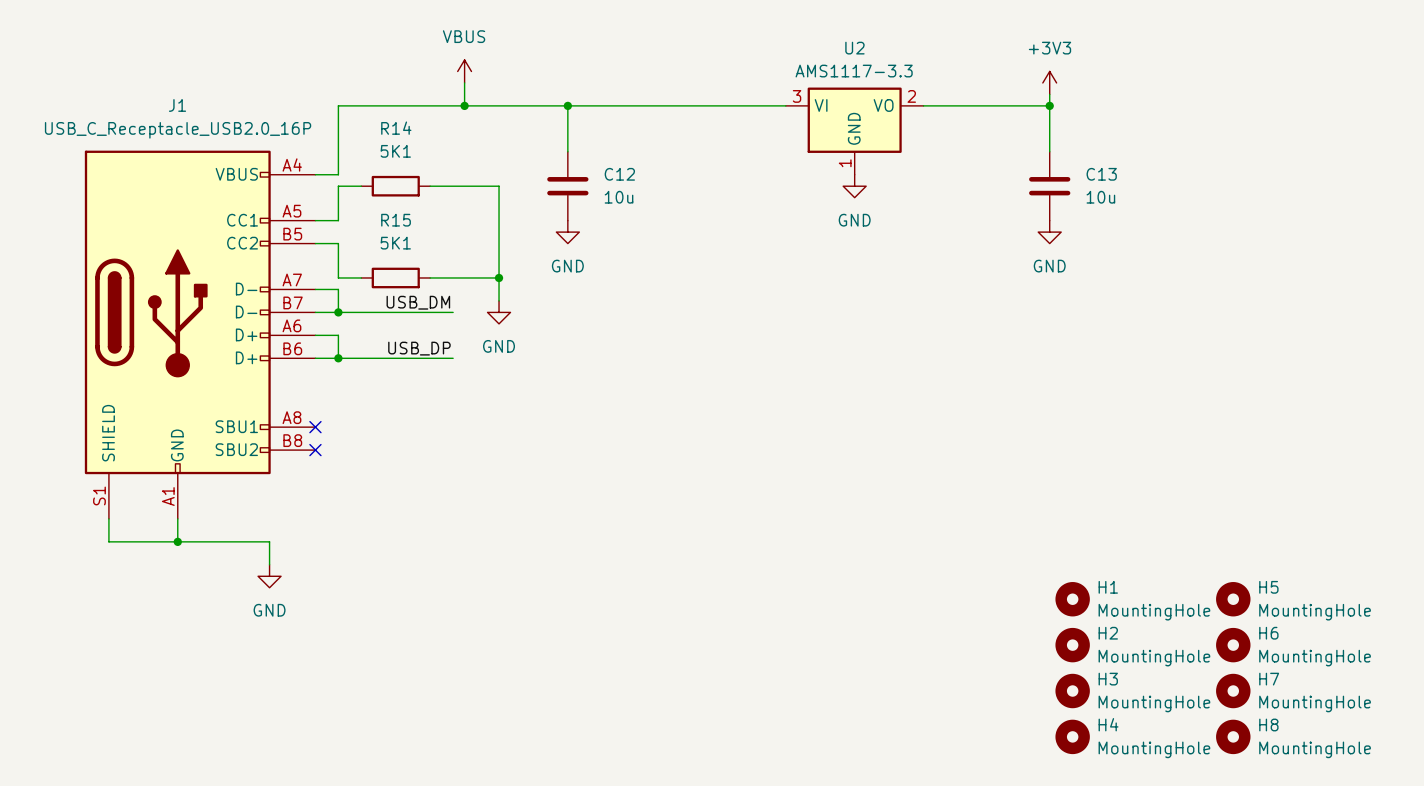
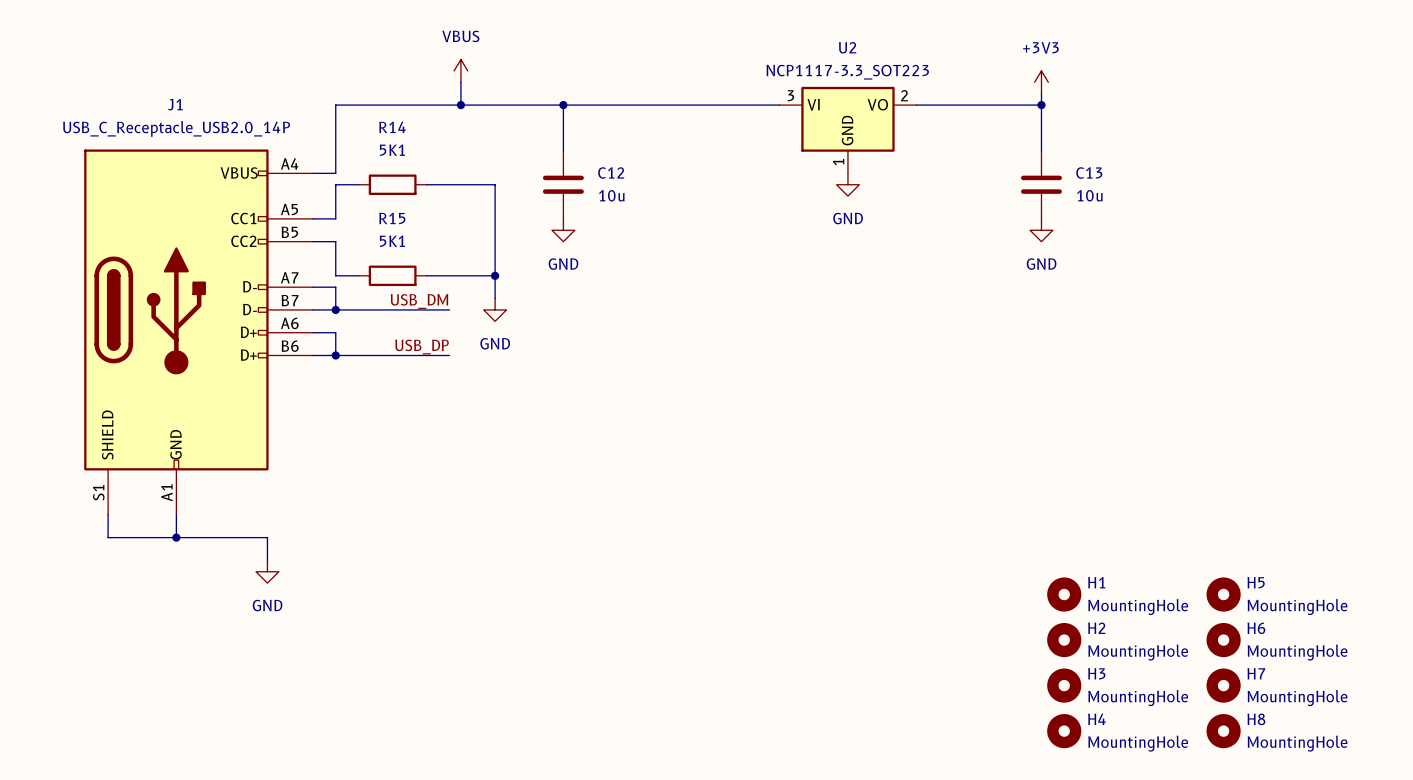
U2 value: AMS1117-3.3 (854, 71) -> NCP1117-3.3_SOT223 (847, 72)
J1 value: USB_C_Receptacle_USB2.0_16P (178, 130) -> USB_C_Receptacle_USB2.0_14P (176, 128)
J1 symbol: [84, 150, 316, 519] -> [84, 149, 313, 515]
no-connect mark: (315, 427) -> none
no-connect mark: (315, 450) -> none

